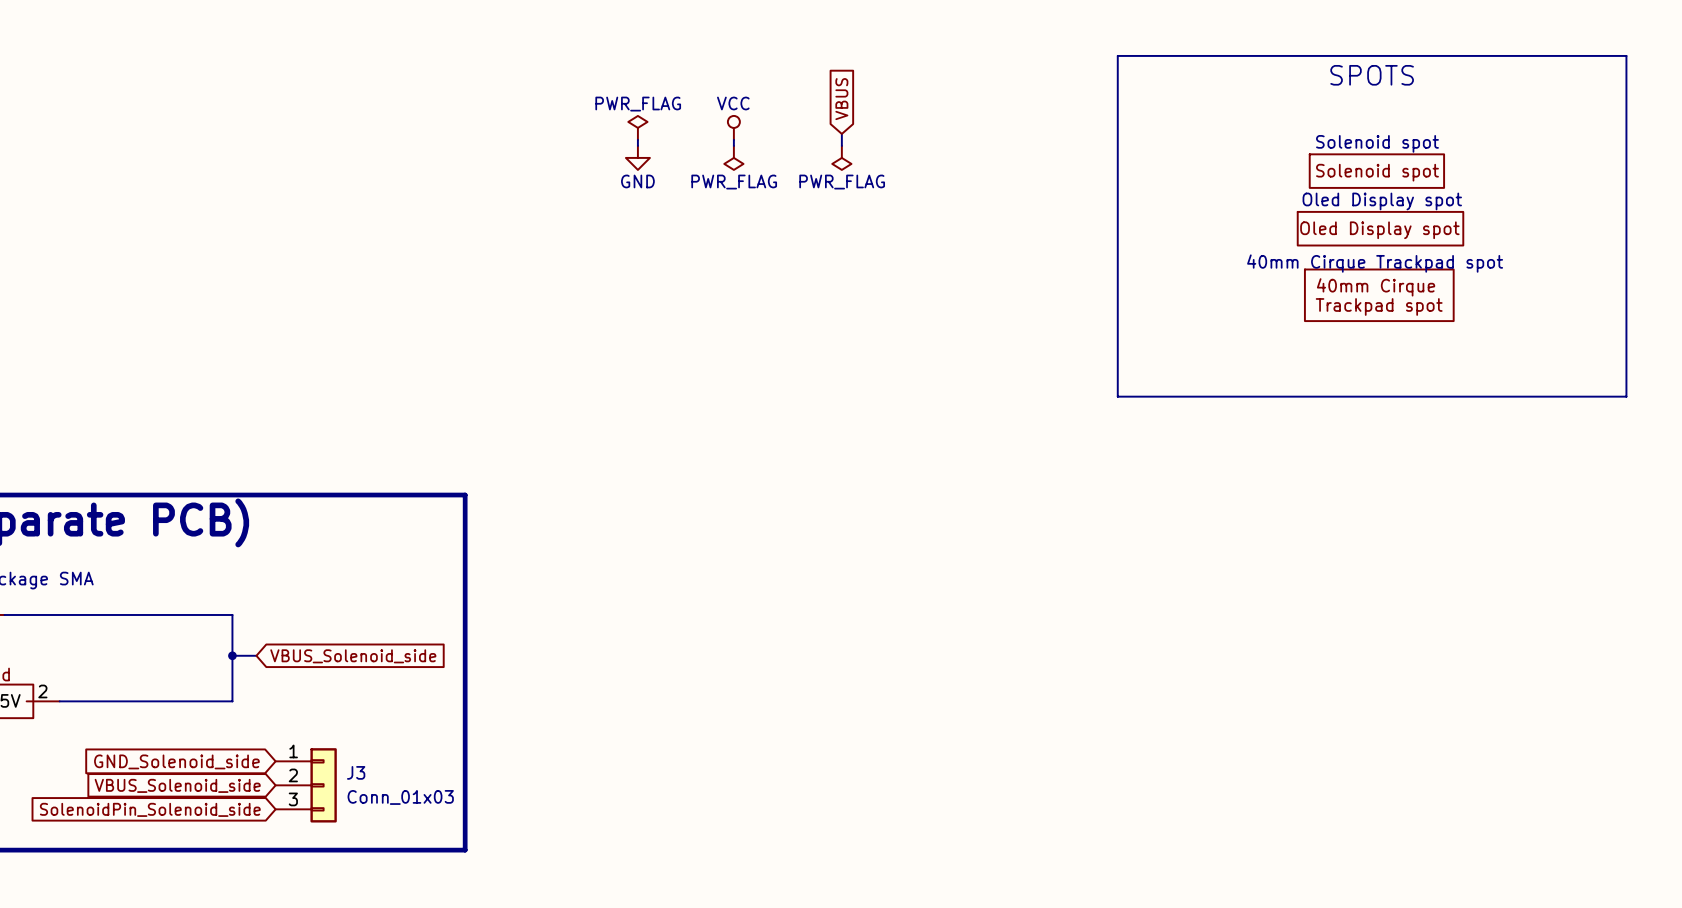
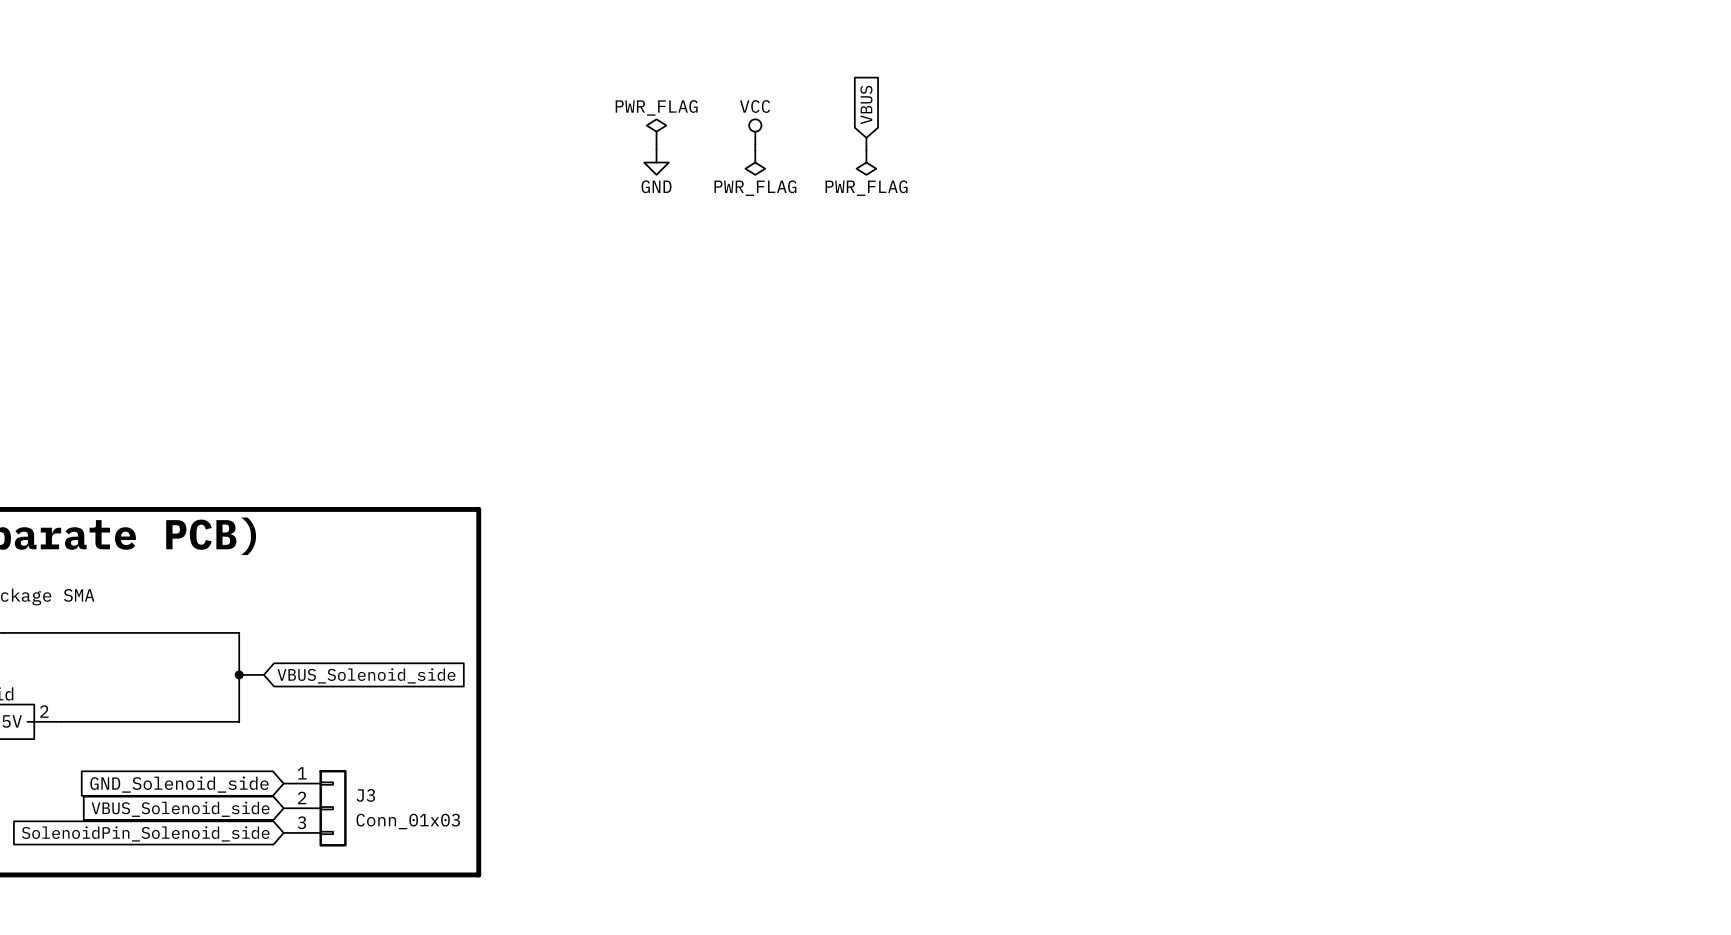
line: (1117, 55) (1626, 55) (1626, 396) (1117, 396) (1117, 55) -> none
text: SPOTS (1372, 75) -> none
part: Solenoid spot (1376, 171) -> none
part: Oled Display spot (1380, 228) -> none
part: 40mm Cirque Trackpad spot (1379, 295) -> none

